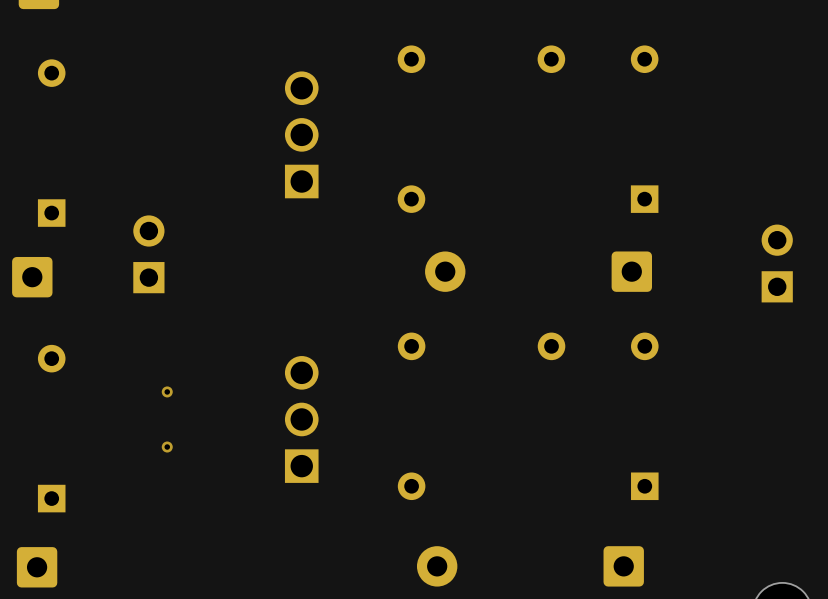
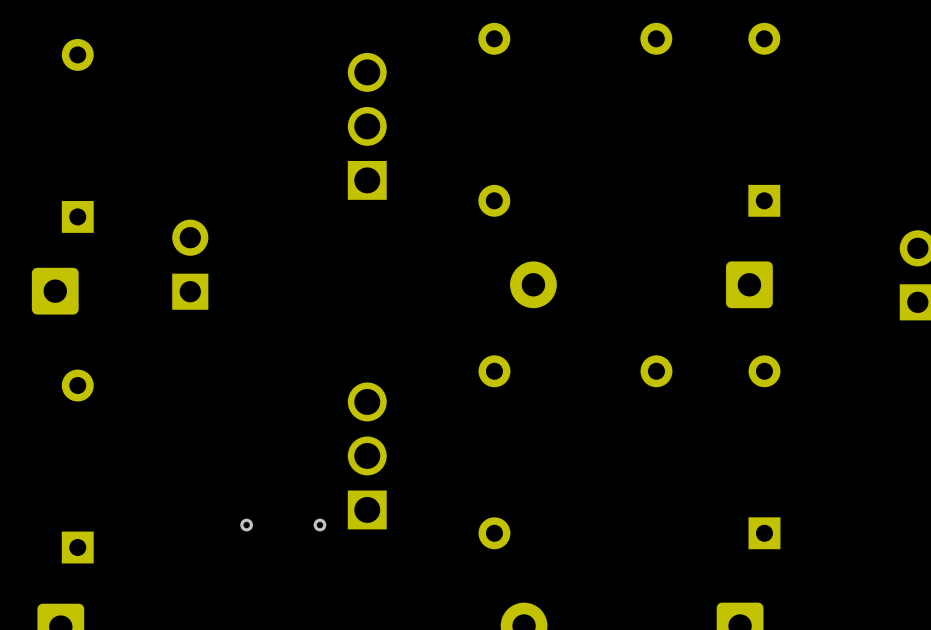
via: (167, 391) -> none
via position: (167, 447) -> (246, 525)
via: none -> (319, 525)

